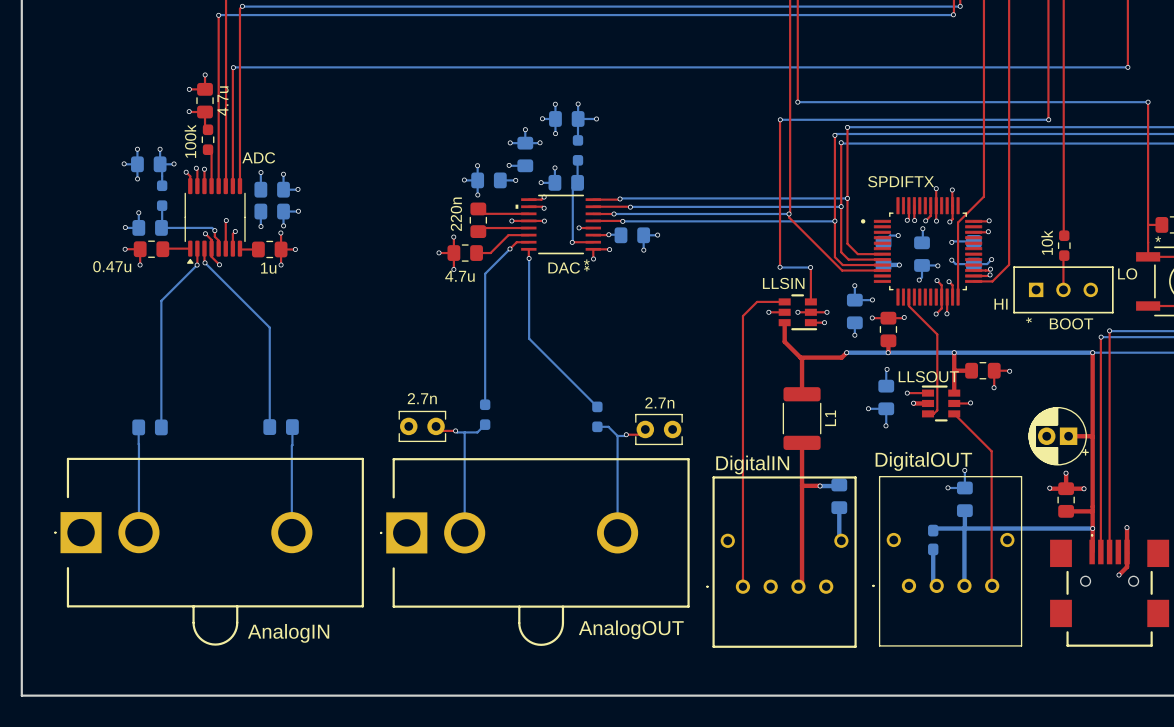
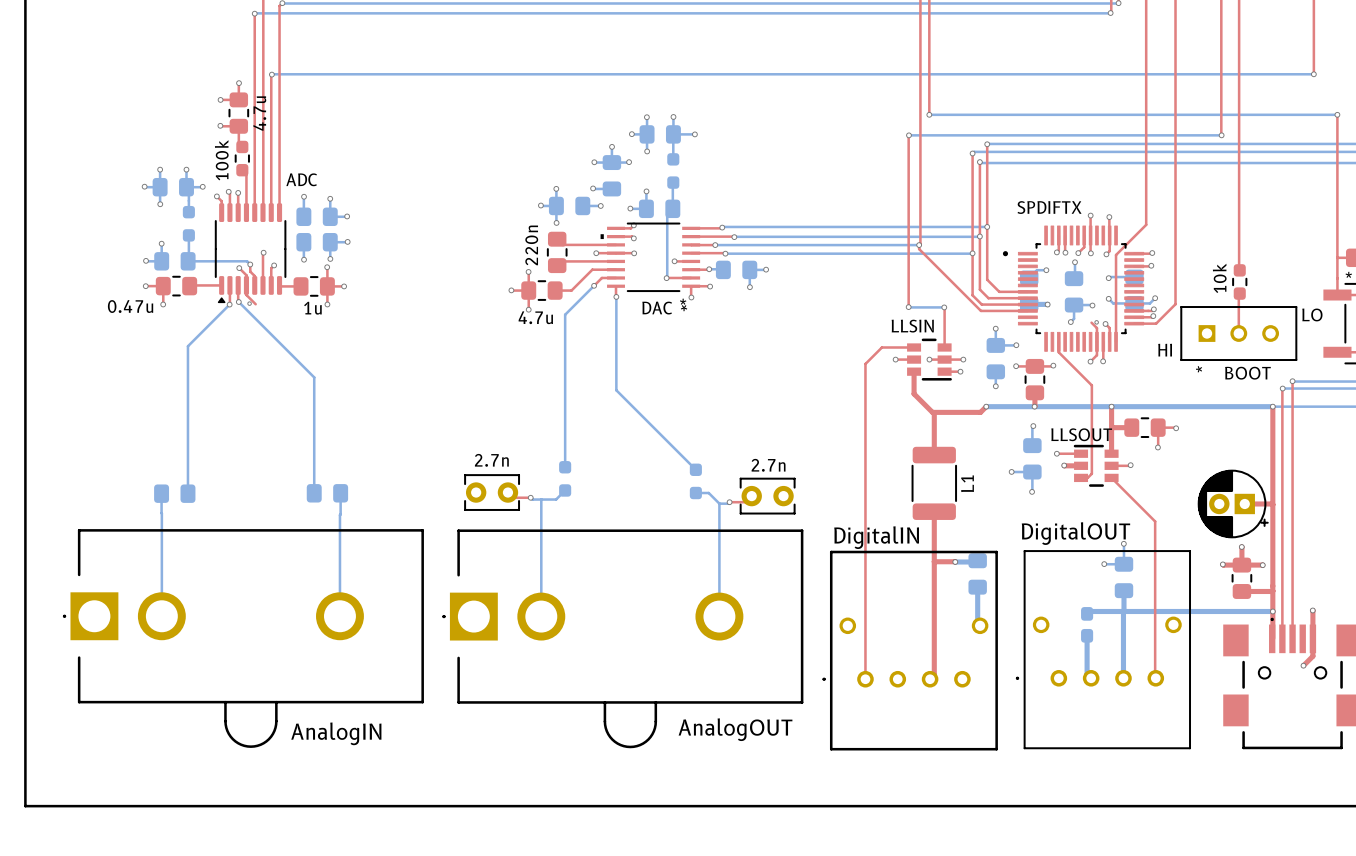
via: none -> (249, 303)
via: (219, 264) -> none
via: (937, 280) -> none
via: none -> (1096, 322)

